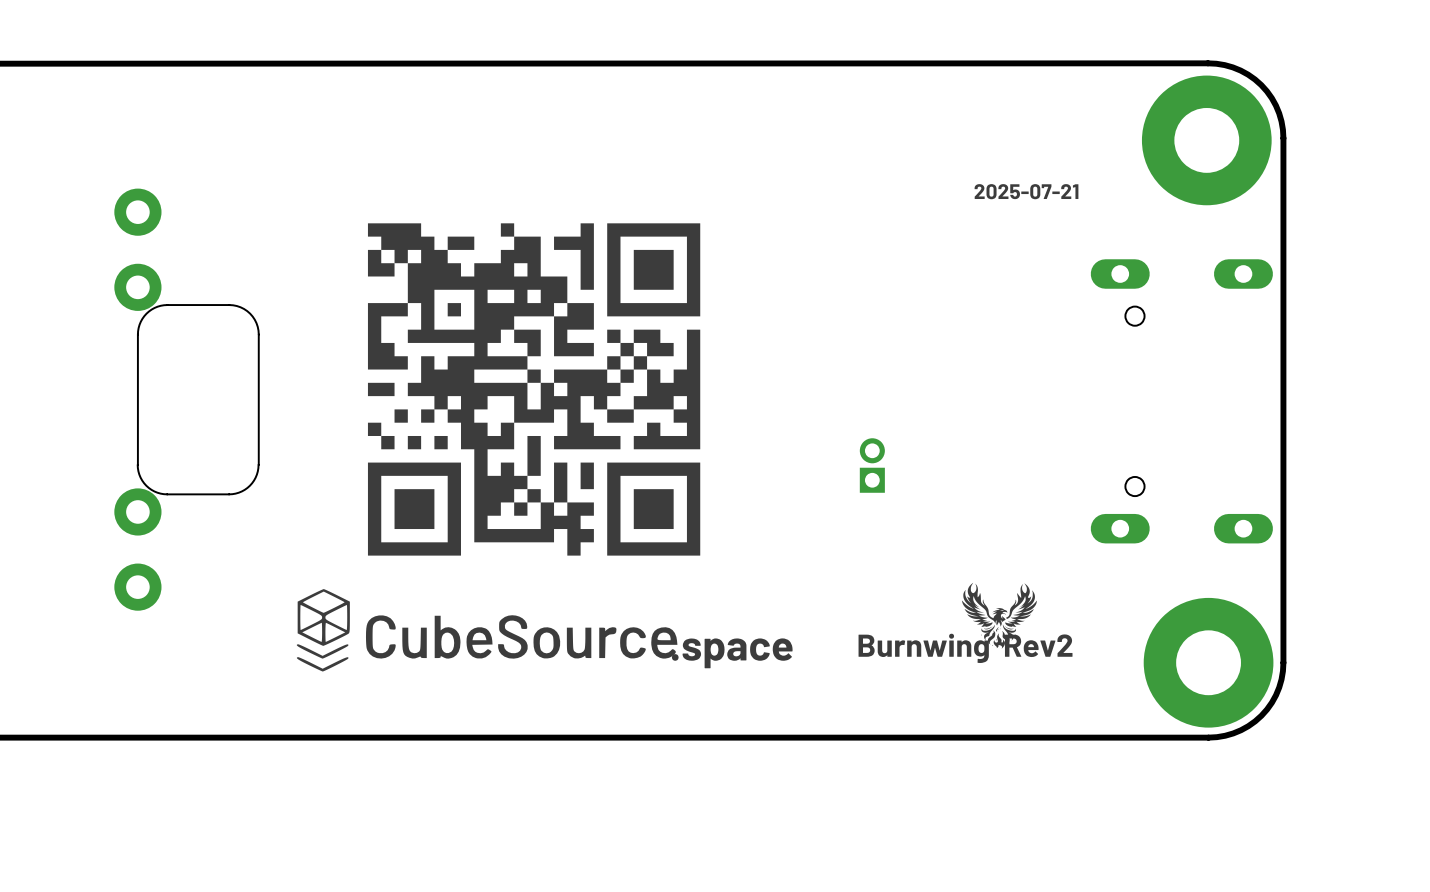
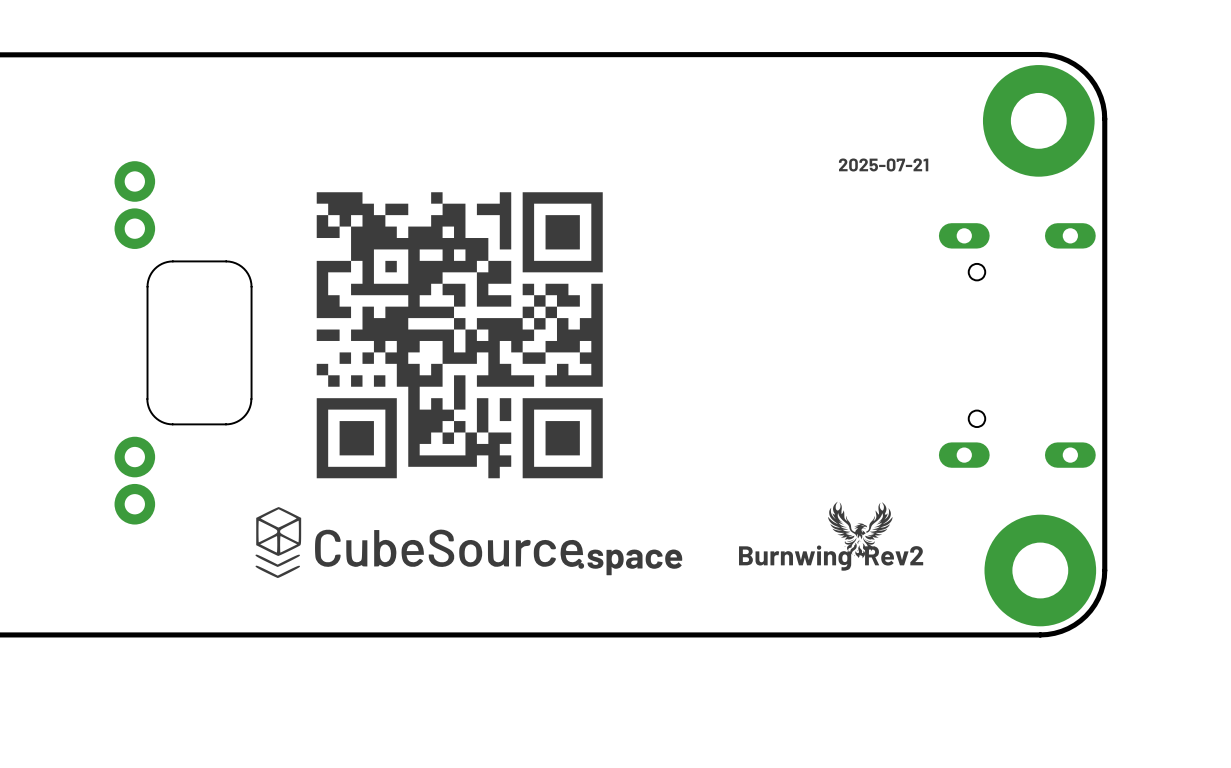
part footprint: [114, 188, 260, 611] -> [114, 161, 253, 525]
part: (872, 465) -> none

